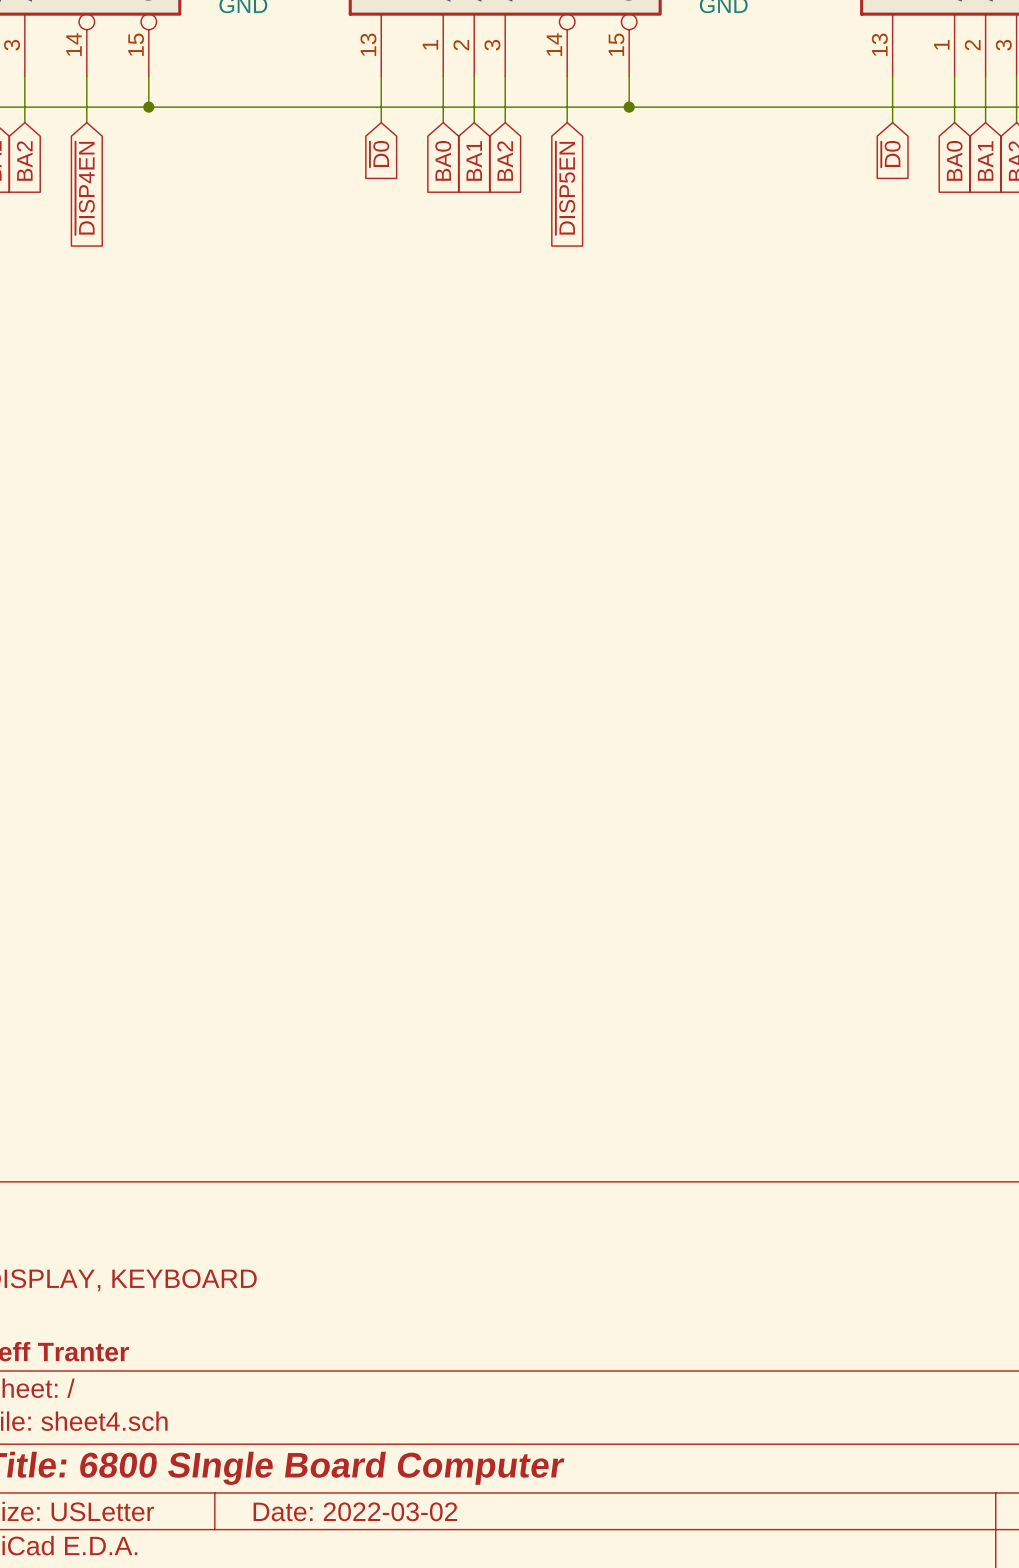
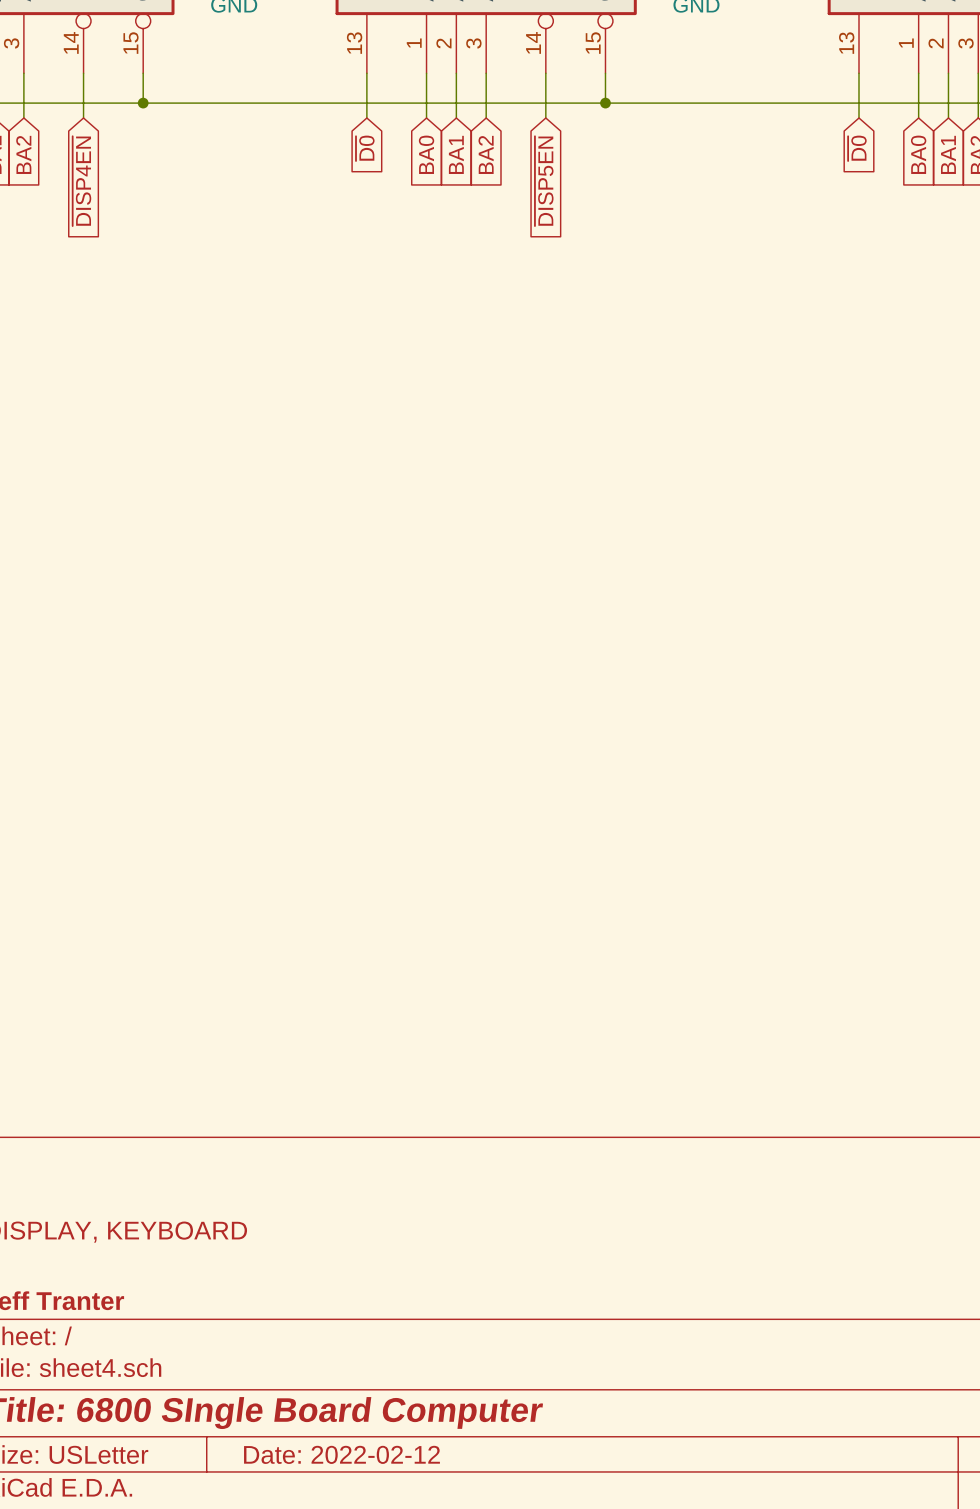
title block: Date: 2022-03-02 (355, 1511) -> Date: 2022-02-12 (341, 1454)

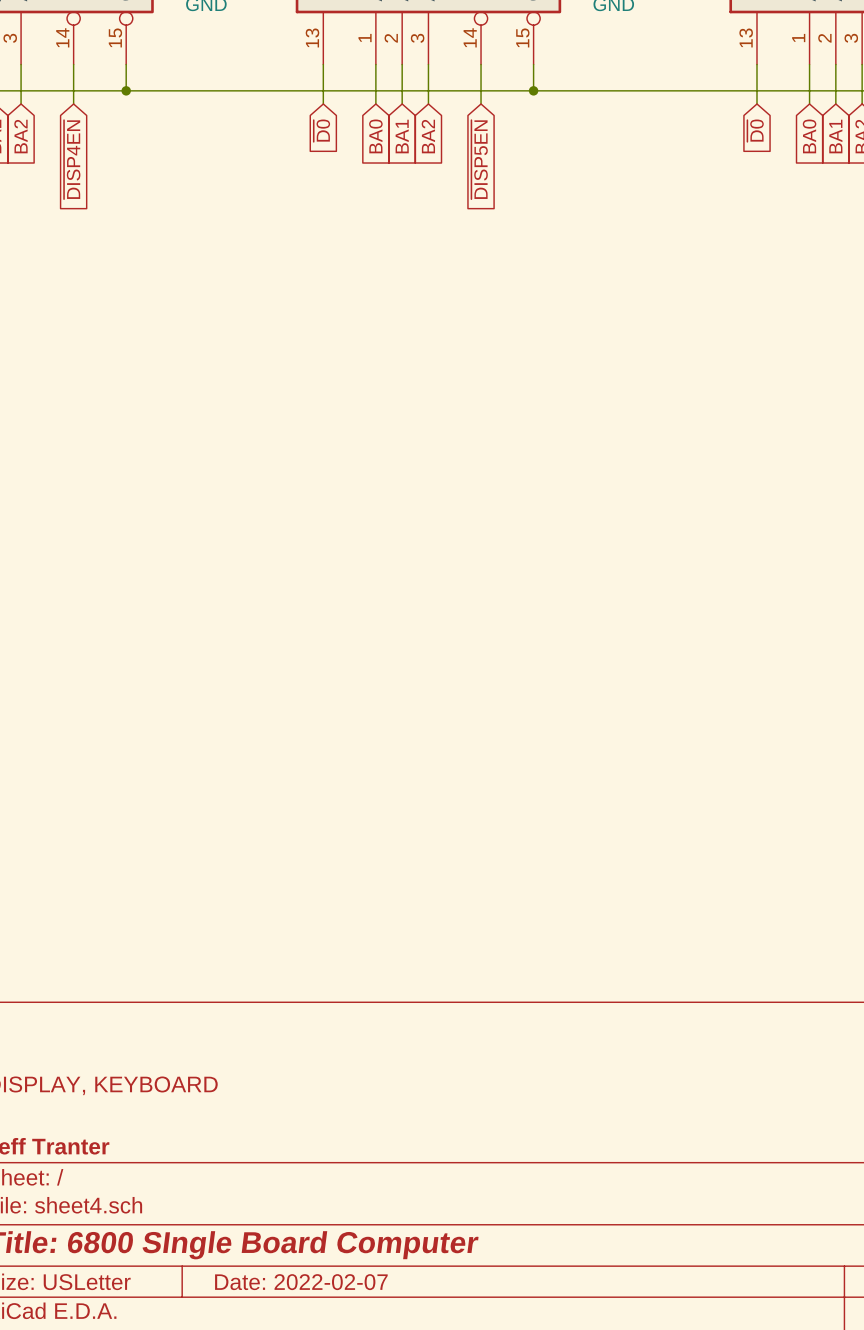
title block: Date: 2022-02-12 (341, 1454) -> Date: 2022-02-07 (301, 1282)

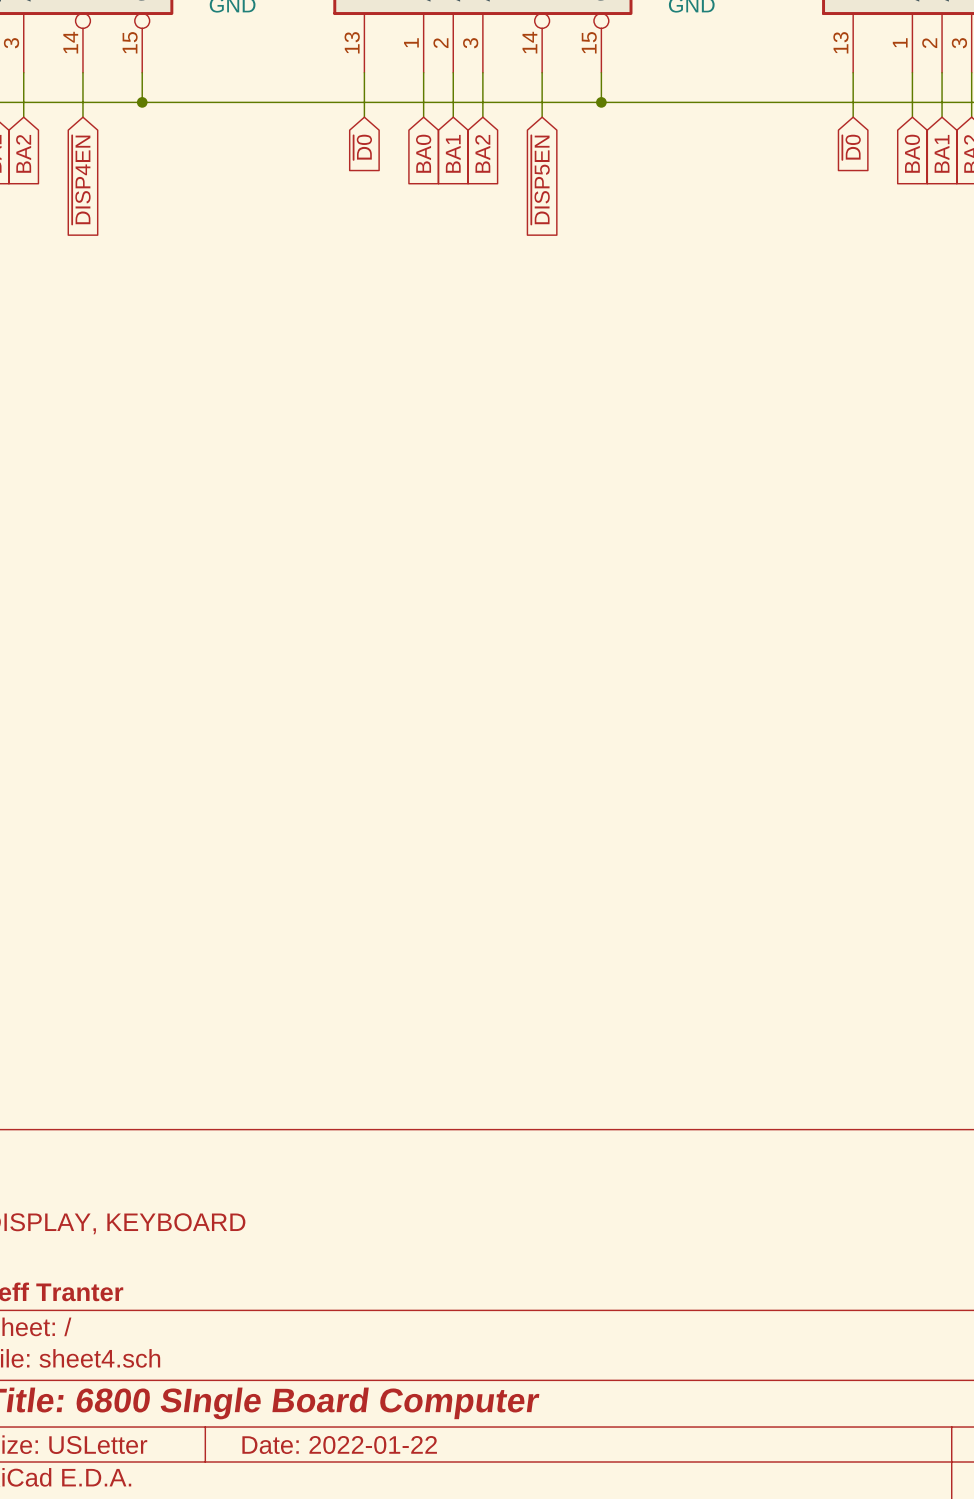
title block: Date: 2022-02-07 (301, 1282) -> Date: 2022-01-22 (339, 1445)

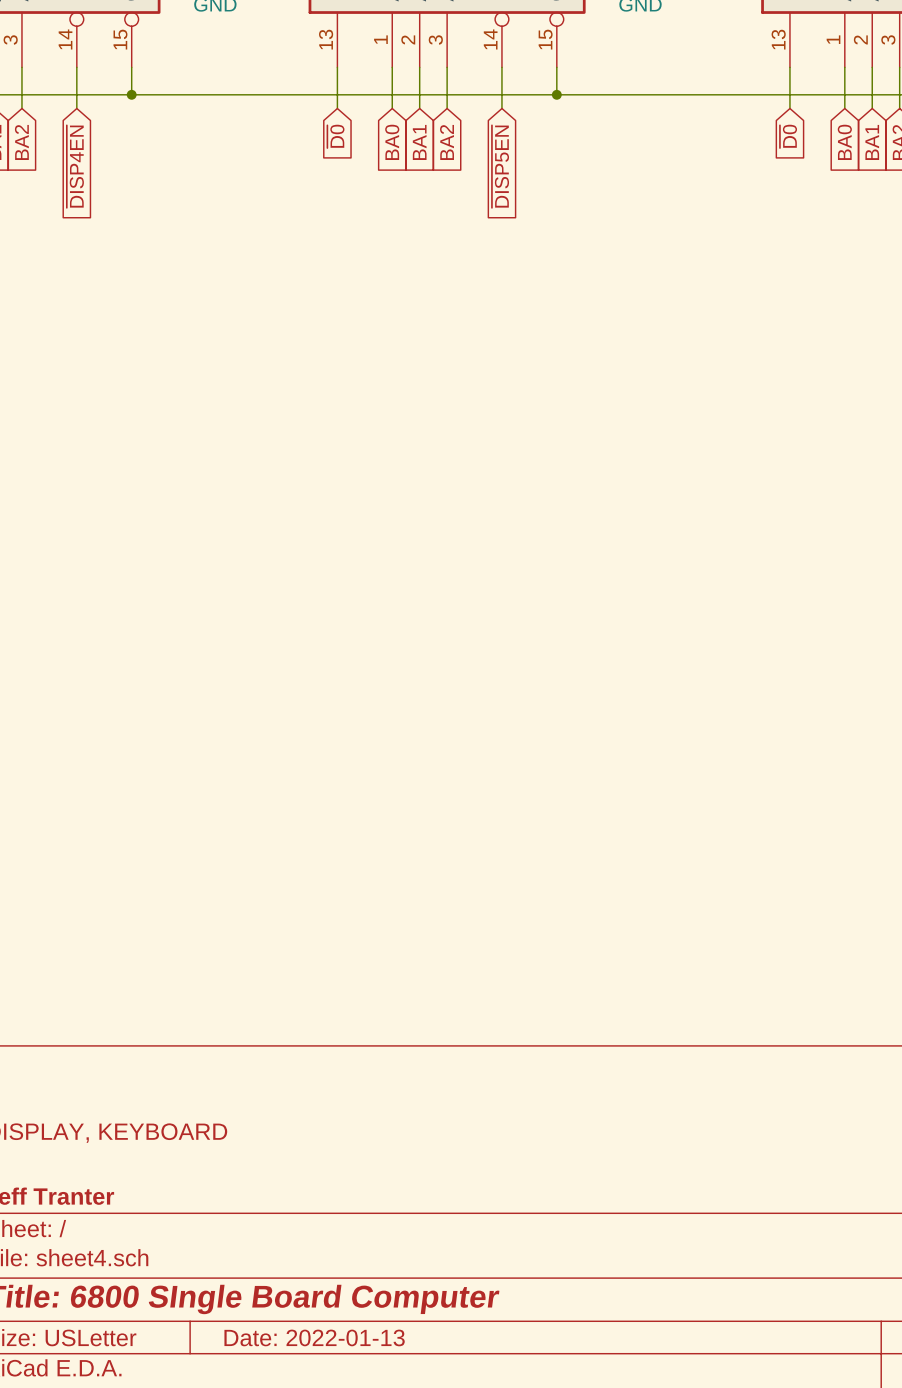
title block: Date: 2022-01-22 (339, 1445) -> Date: 2022-01-13 (314, 1337)

